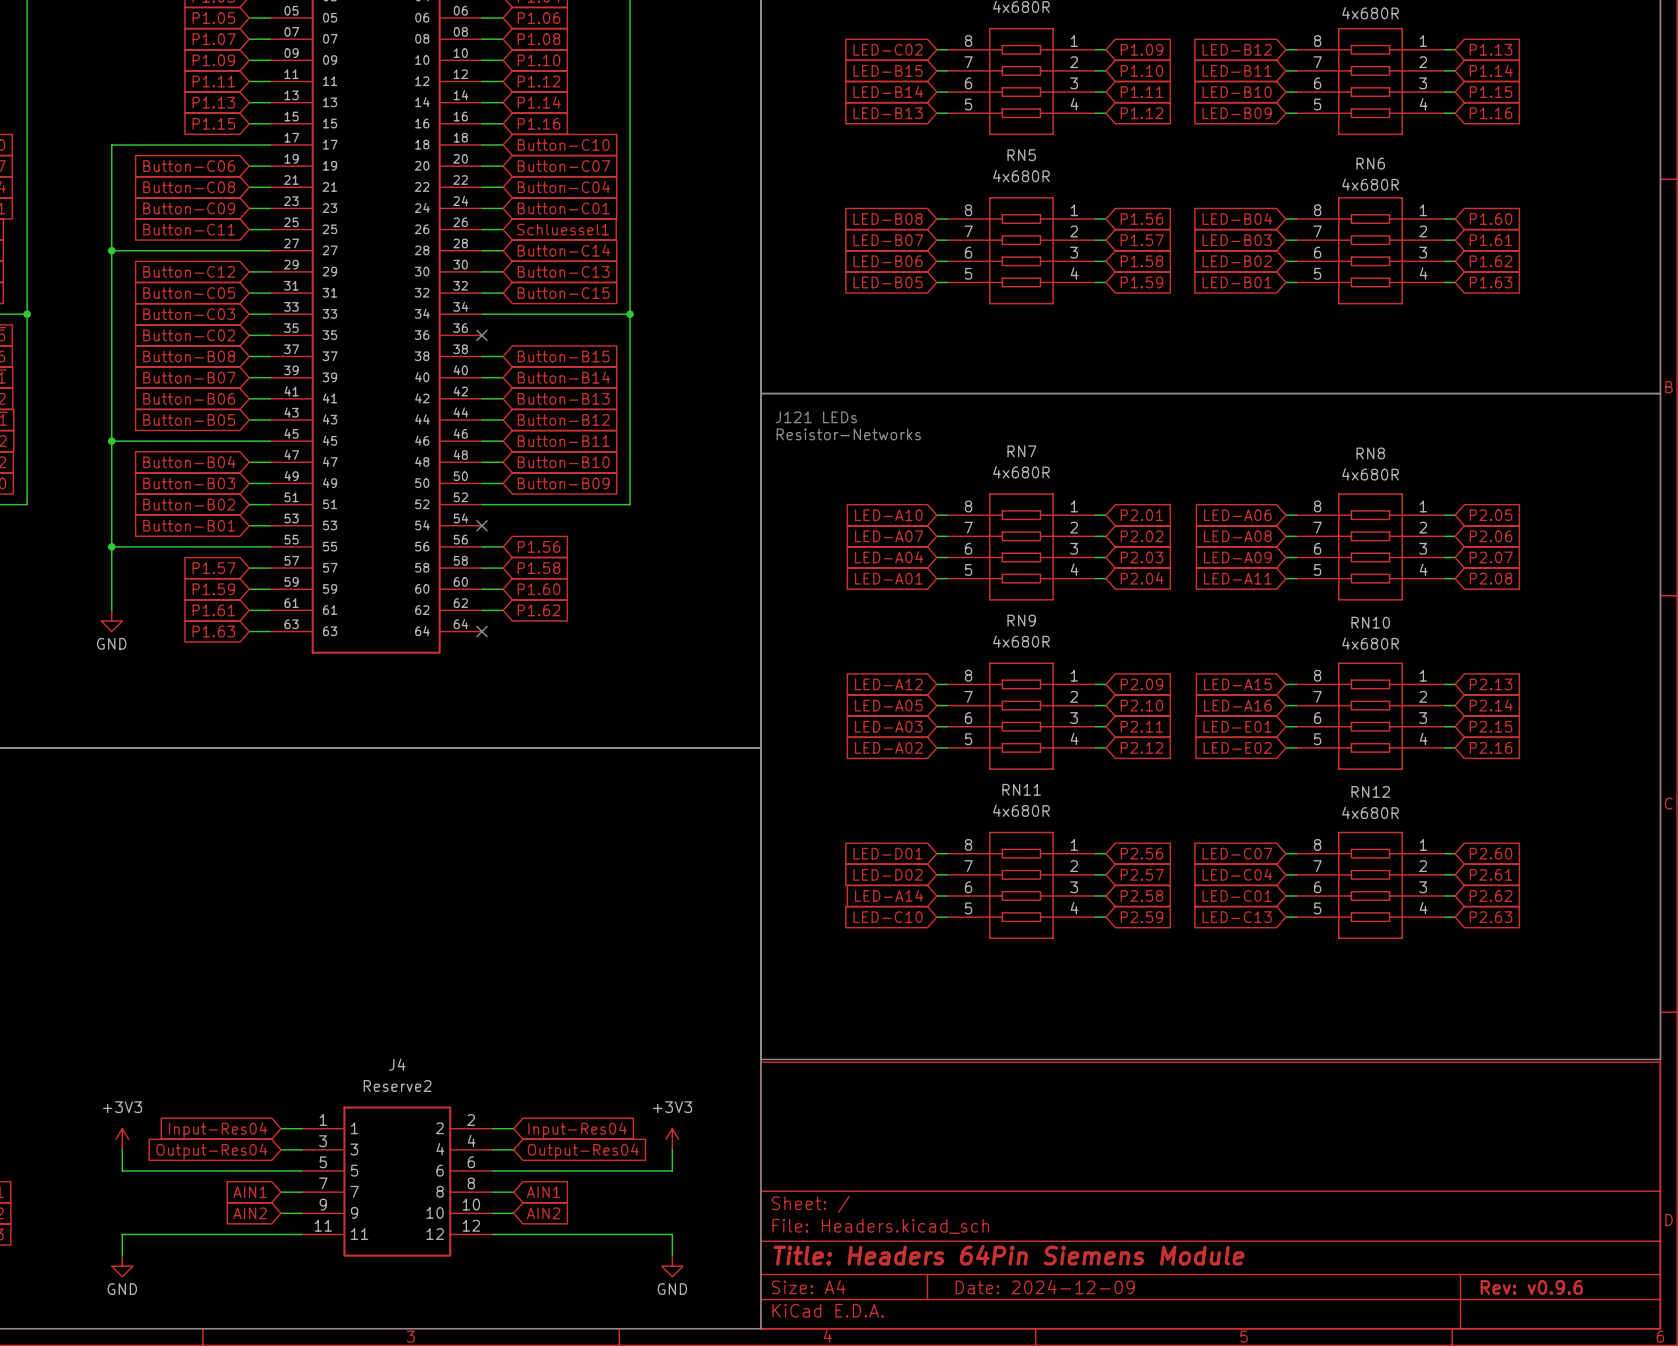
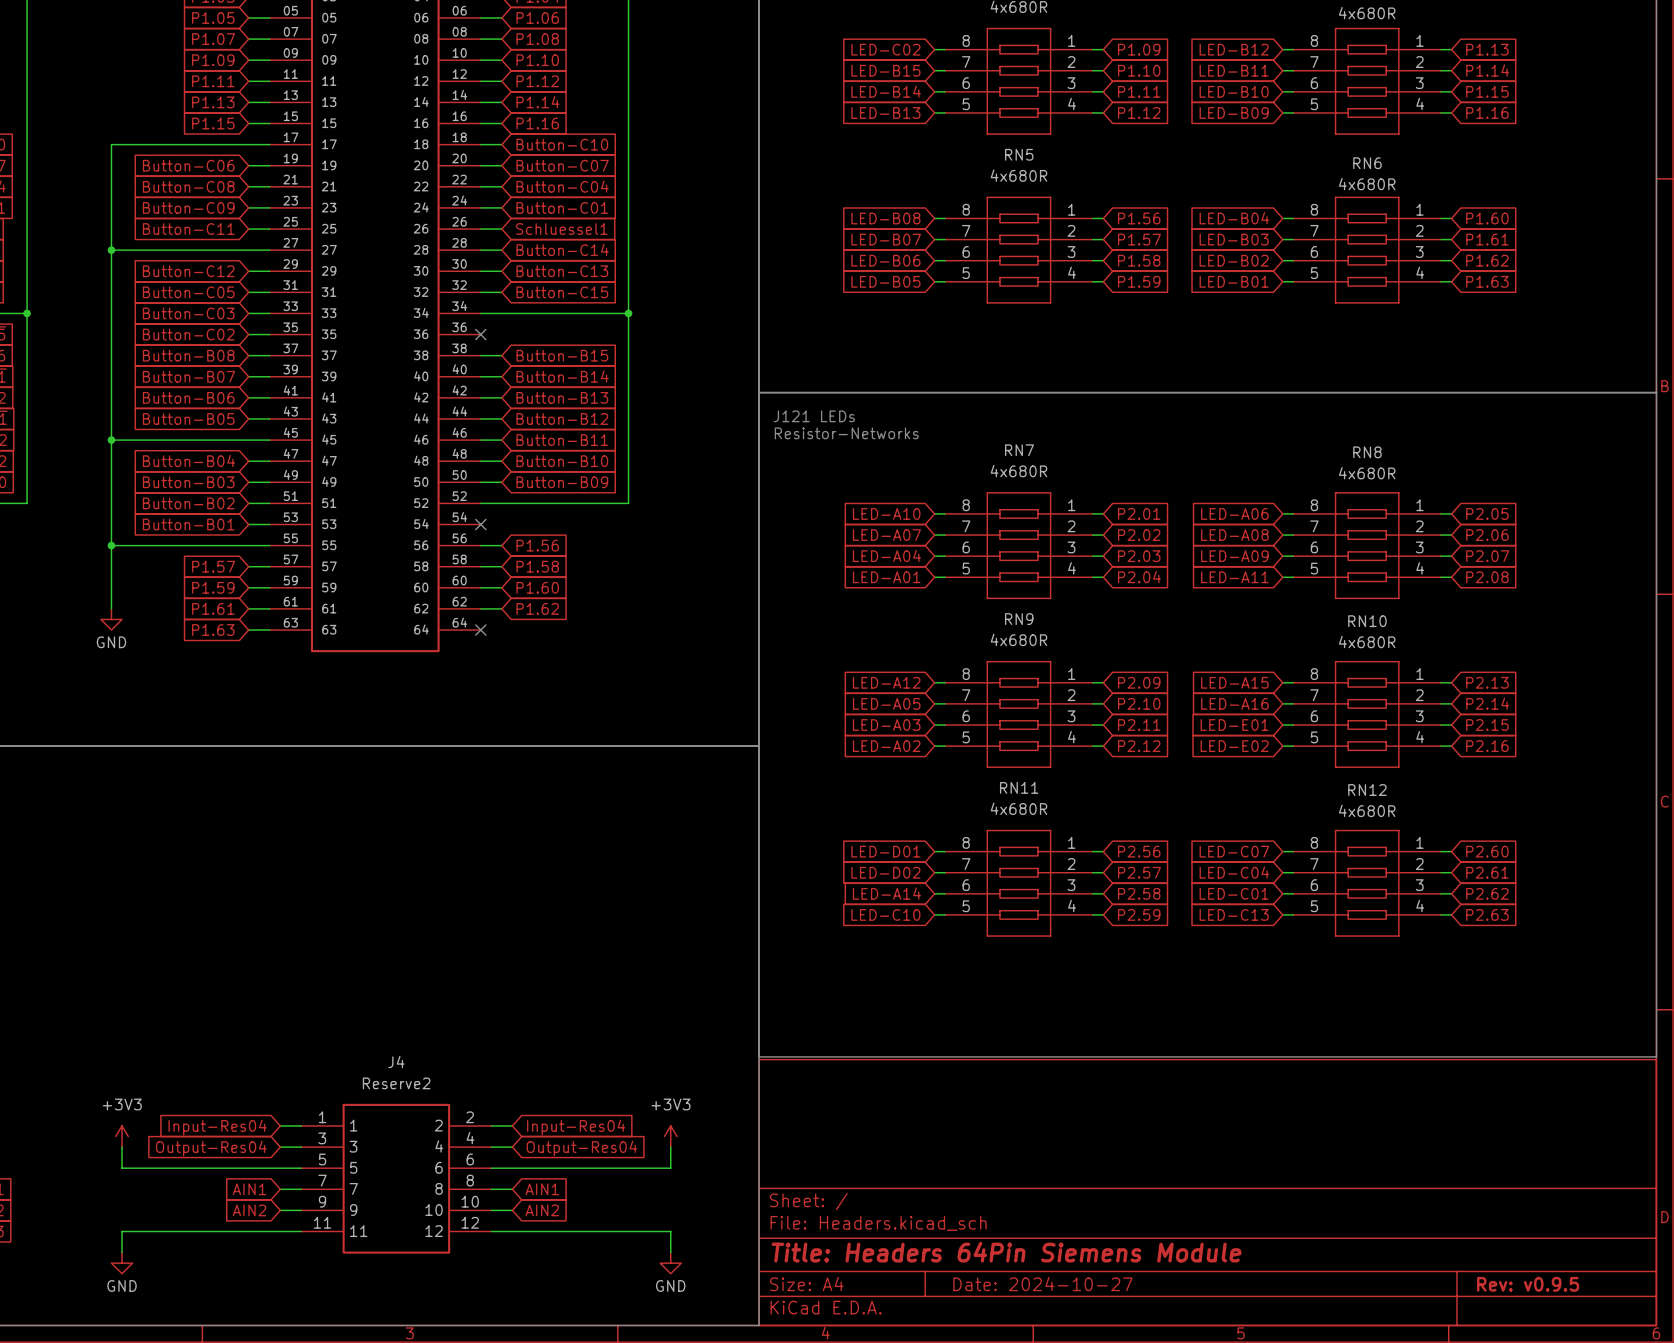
title block: Date: 2024-12-09 (1045, 1287) -> Date: 2024-10-27 (1042, 1284)
title block: Rev: v0.9.6 (1531, 1287) -> Rev: v0.9.5 (1528, 1284)

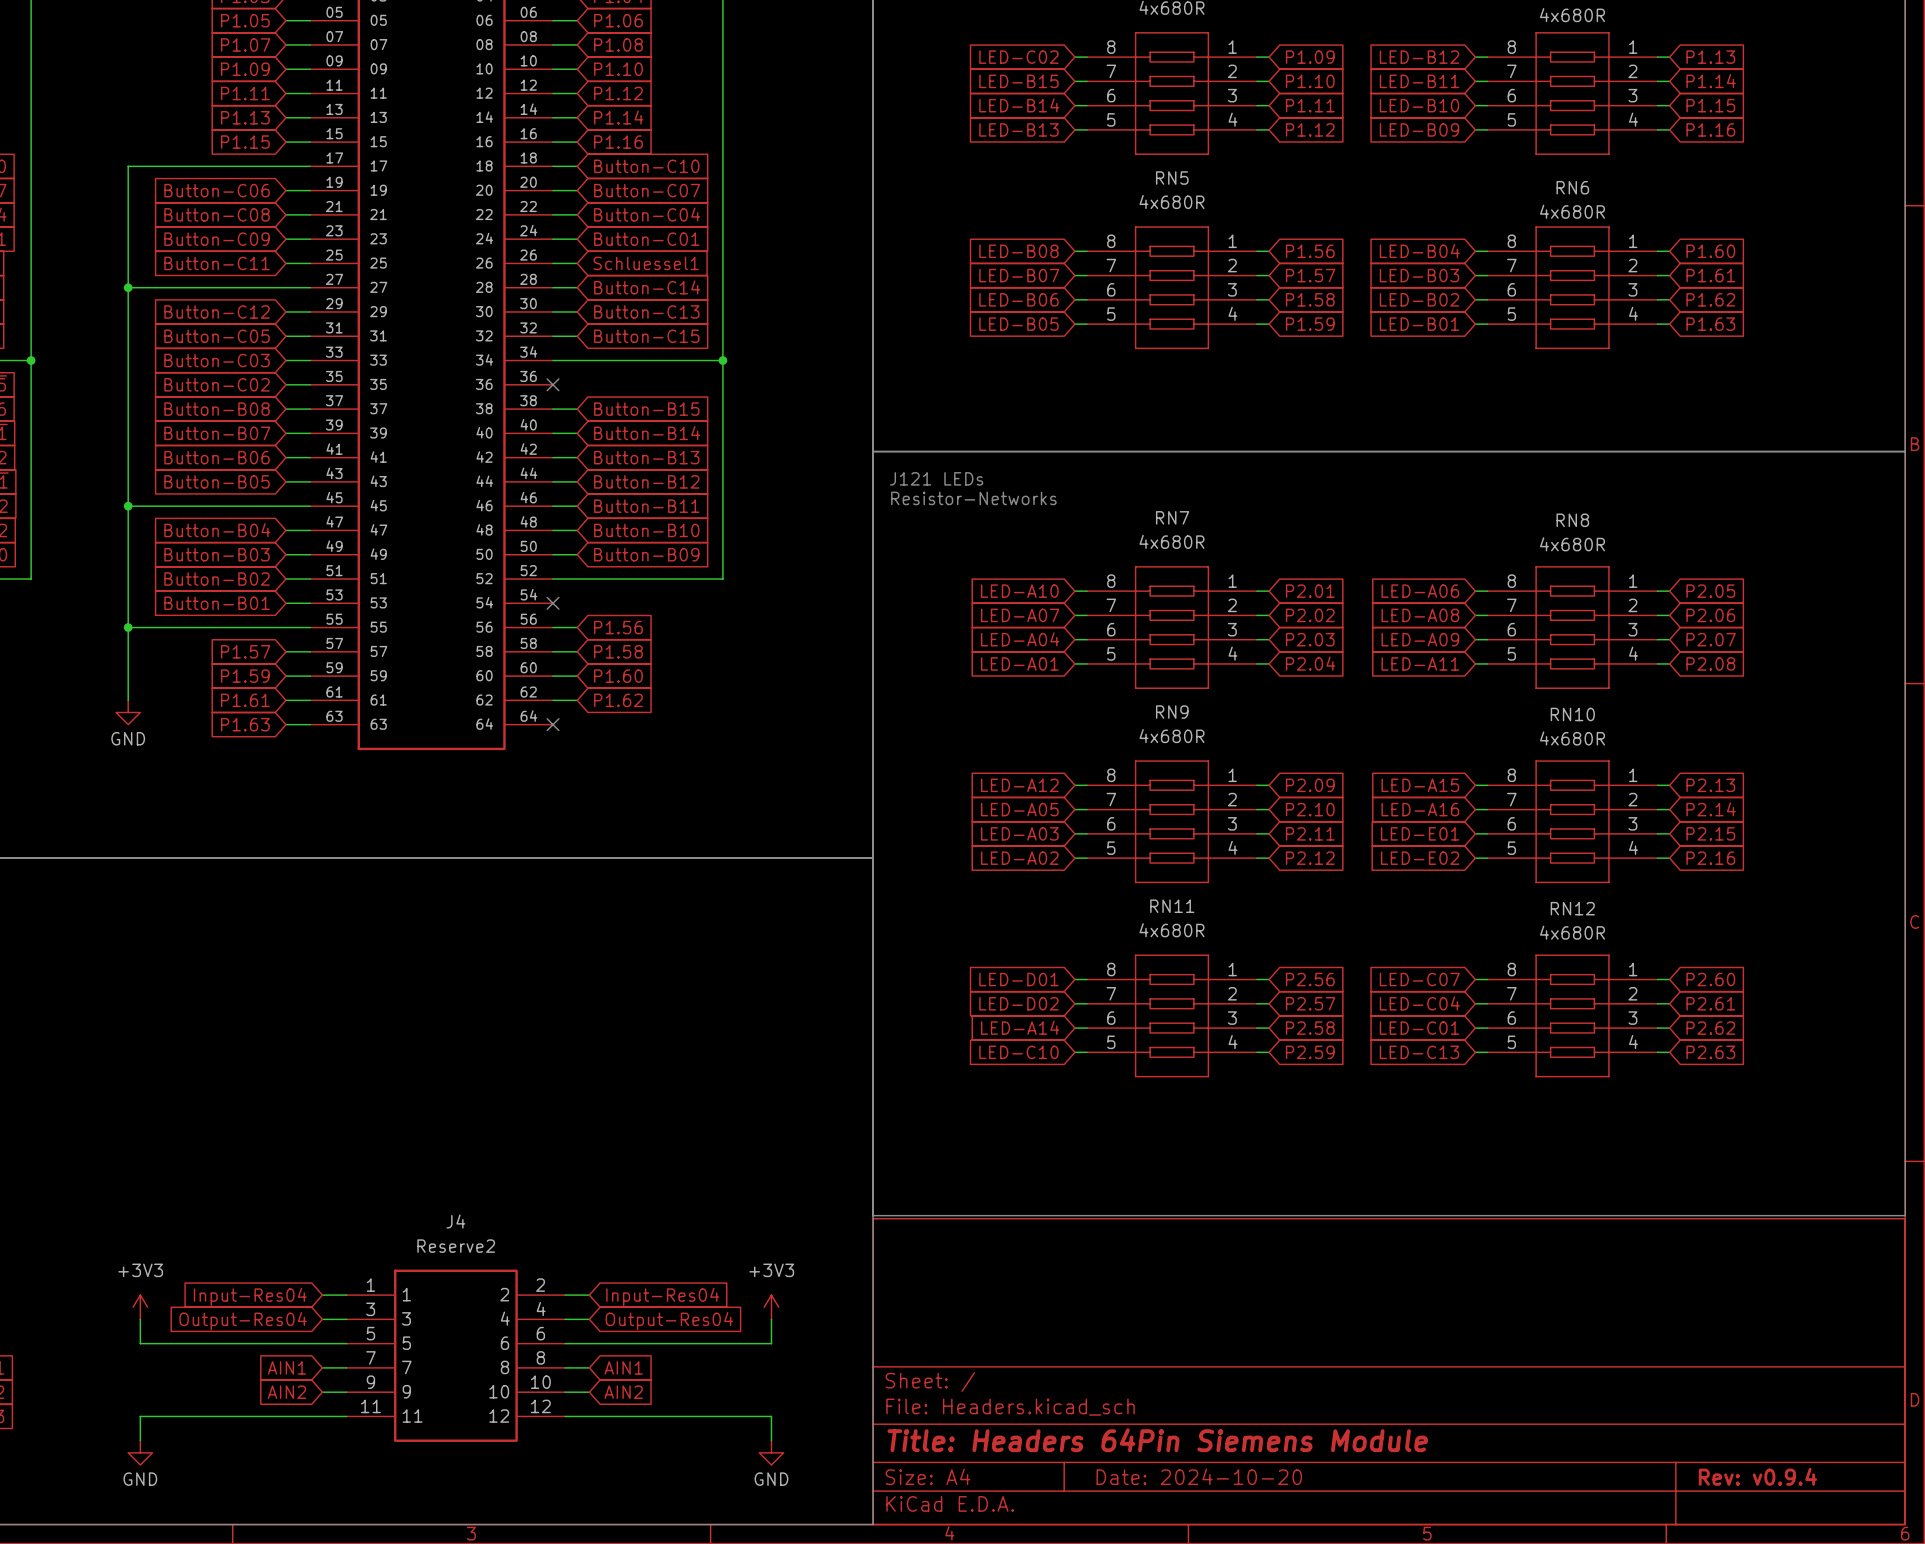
title block: Date: 2024-10-27 (1042, 1284) -> Date: 2024-10-20 (1199, 1476)
title block: Rev: v0.9.5 (1528, 1284) -> Rev: v0.9.4 (1757, 1476)

